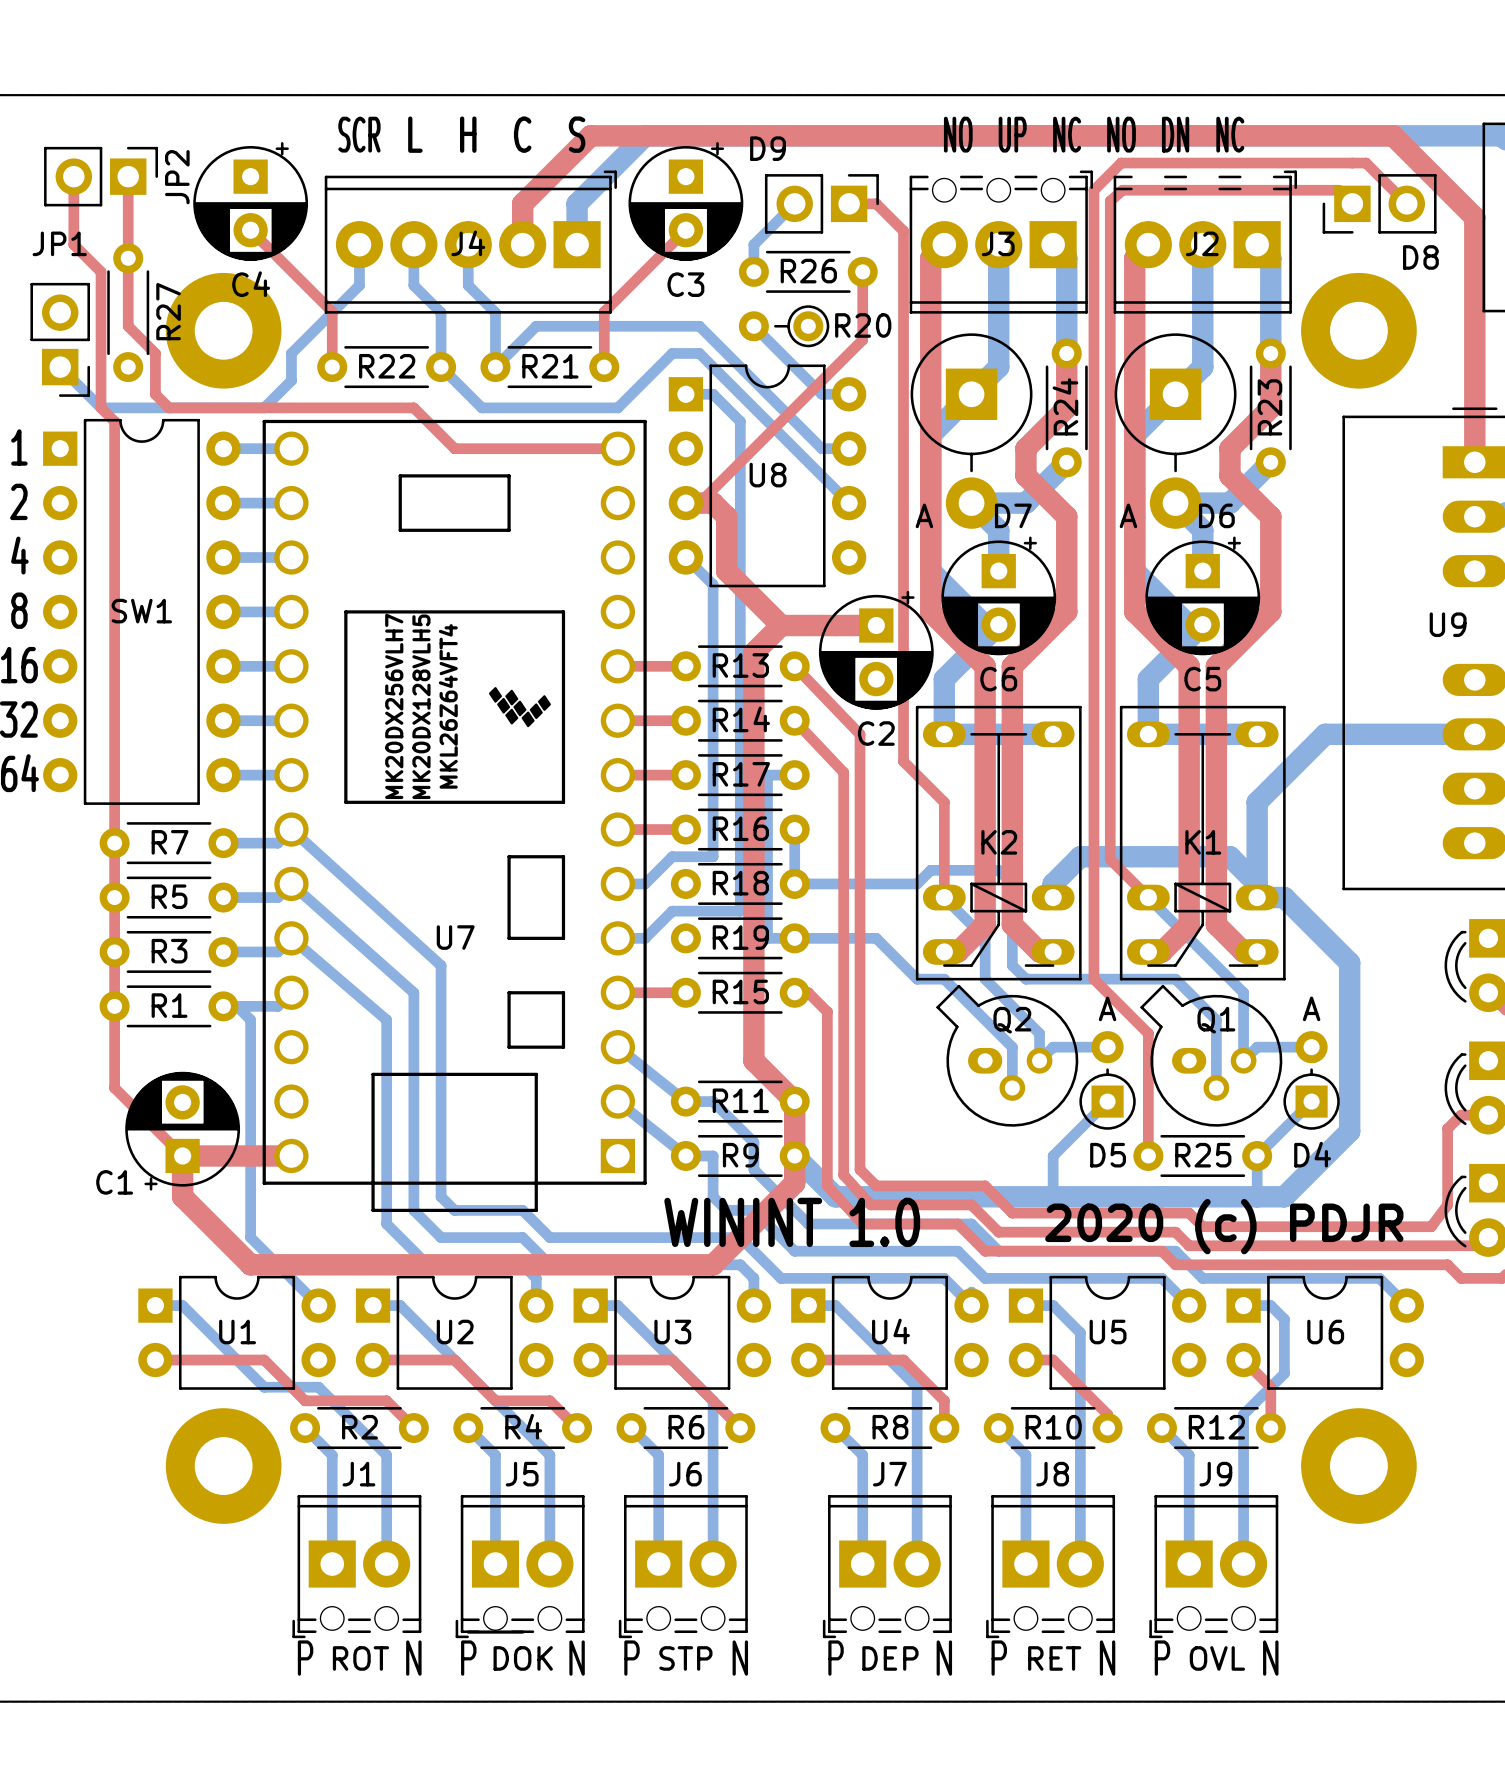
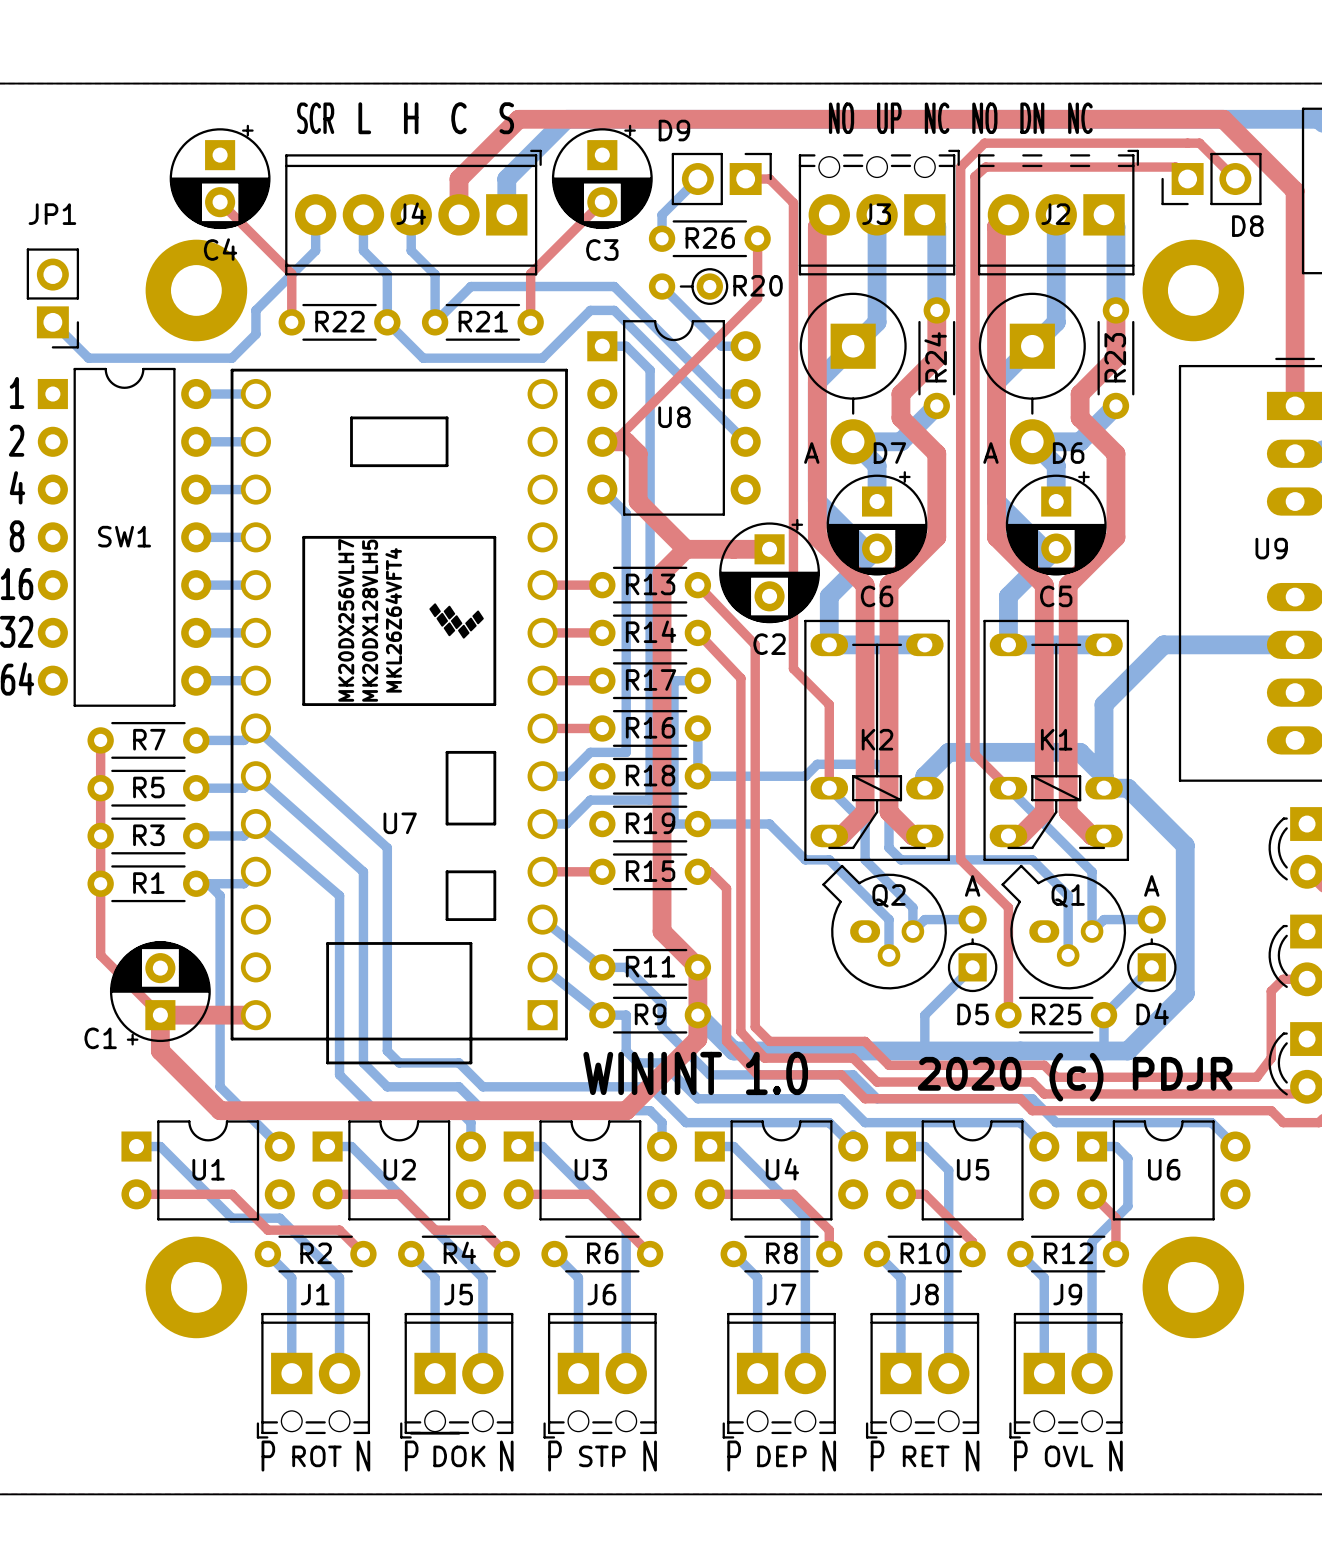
top track: (73, 176) (73, 244) (101, 271) (101, 407) (114, 421) (114, 843) -> none
JP2: (101, 176) -> none
top track: (128, 176) (128, 326) (155, 353) (155, 394) (169, 407) (413, 407) (454, 448) (617, 448) -> none
R27: (128, 312) -> none

